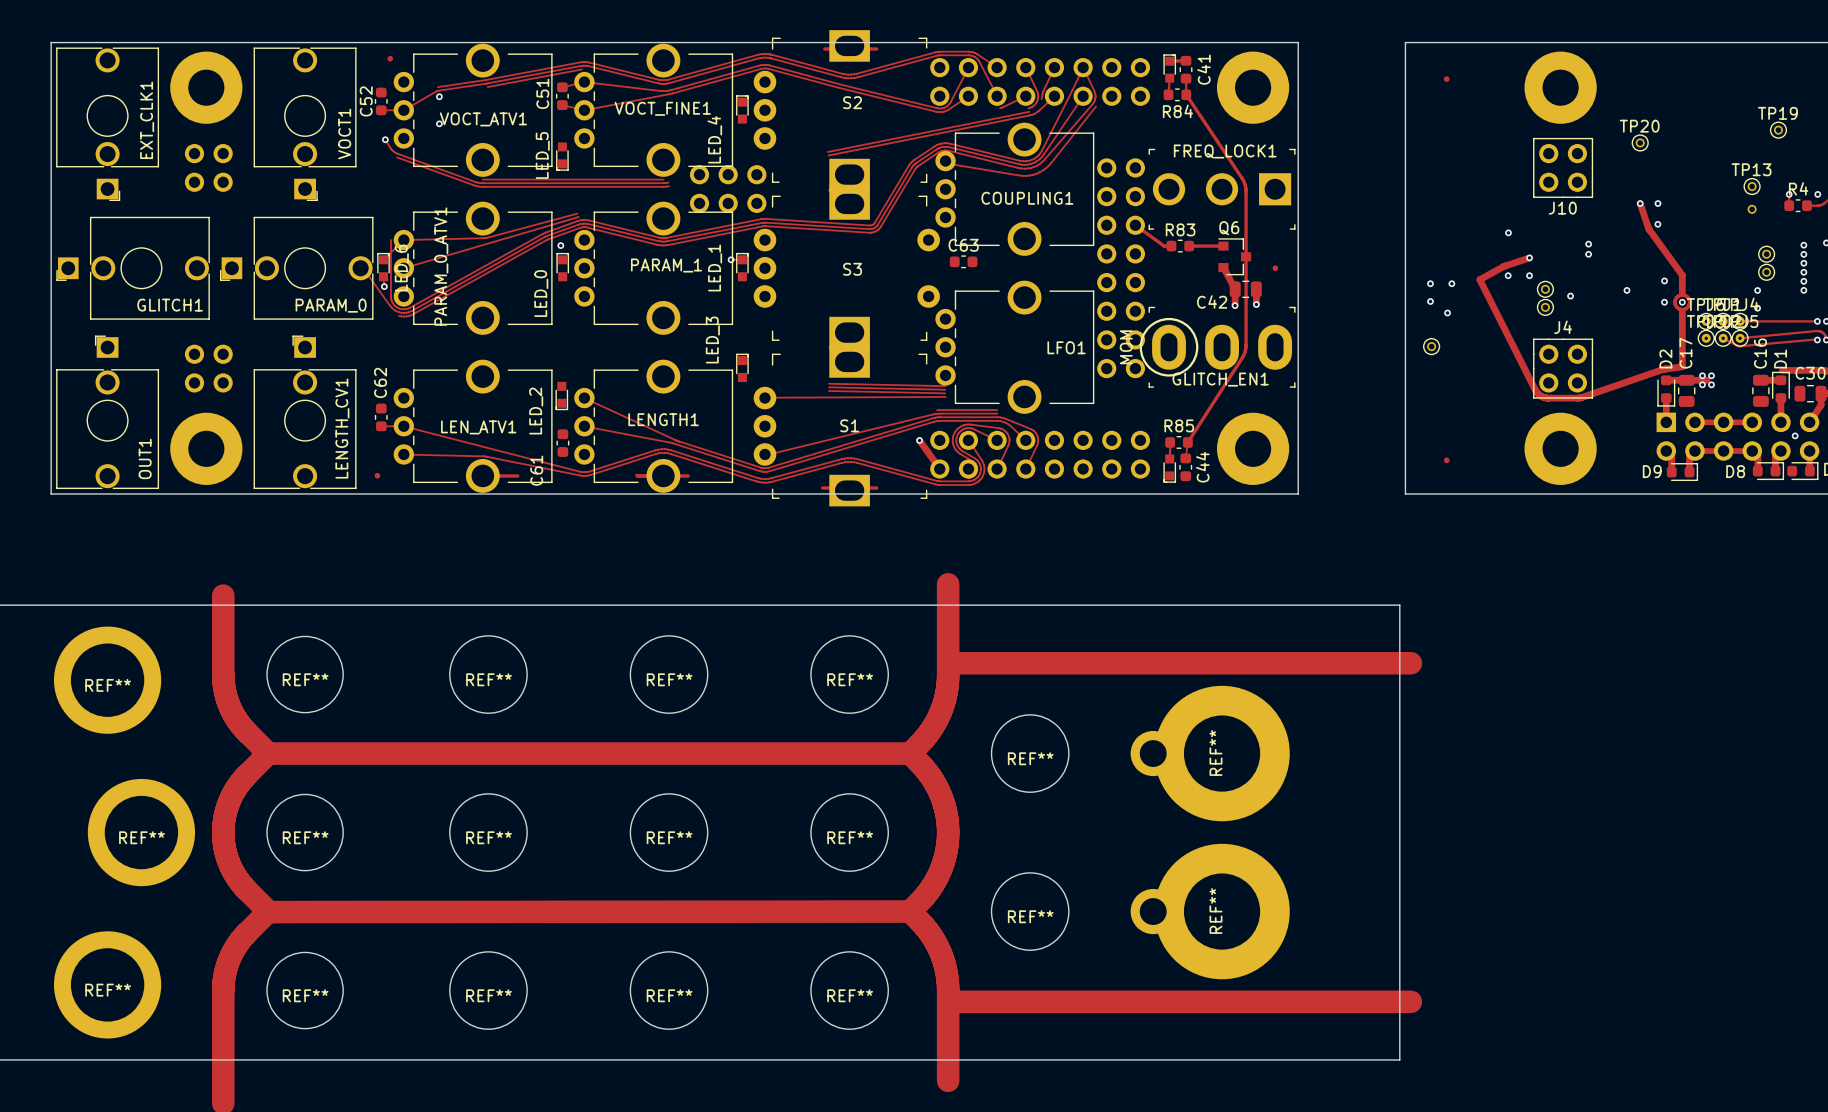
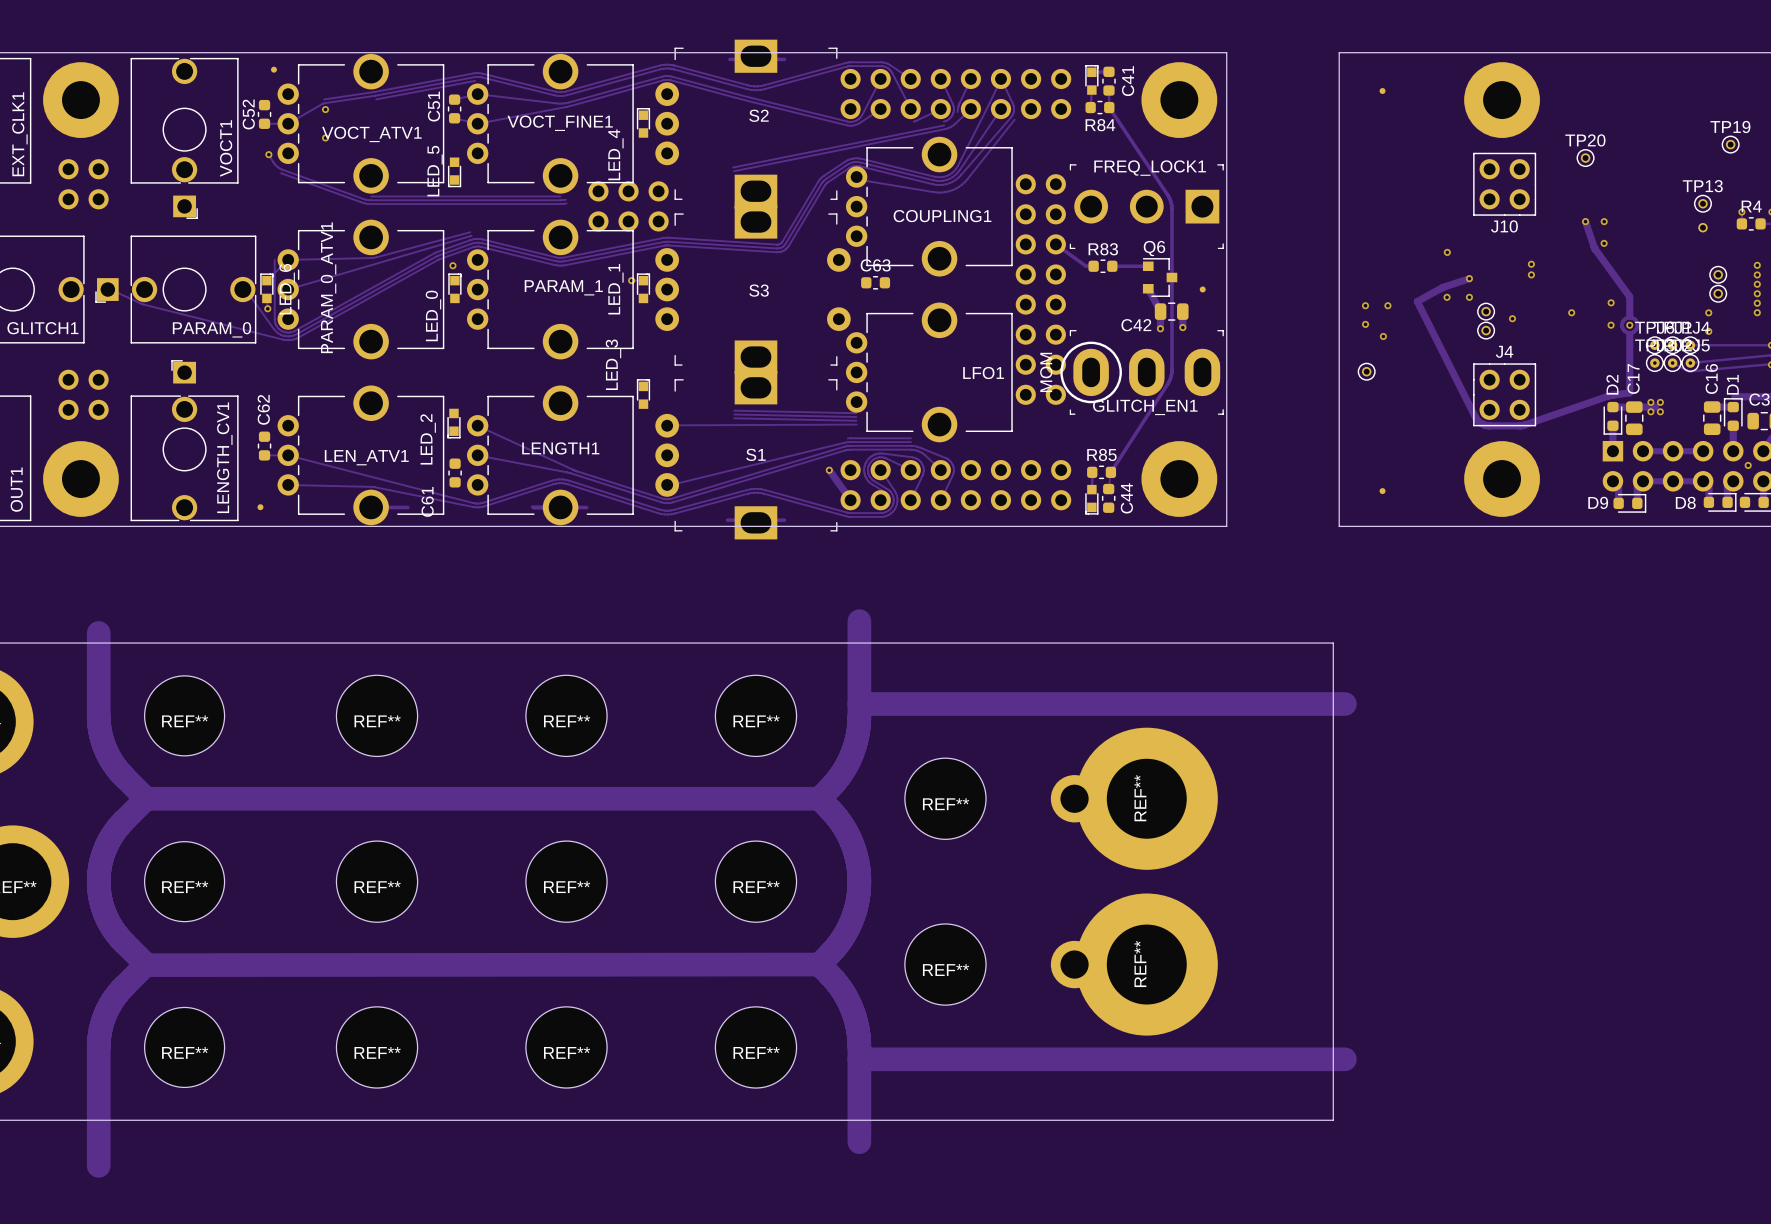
track: none -> (110, 289) (143, 304) (282, 339)

